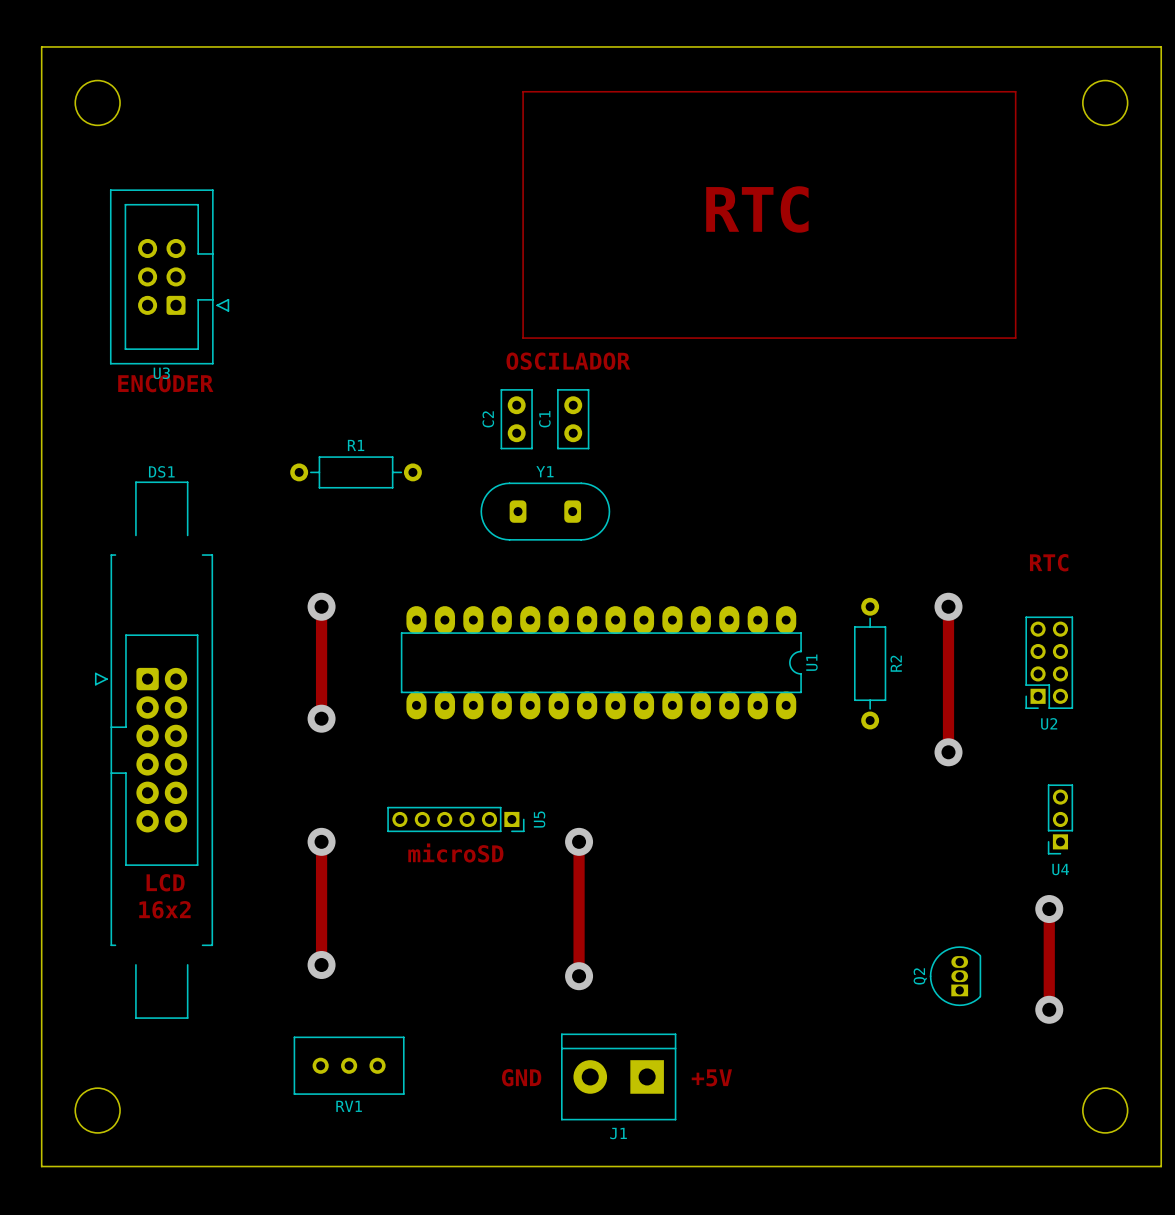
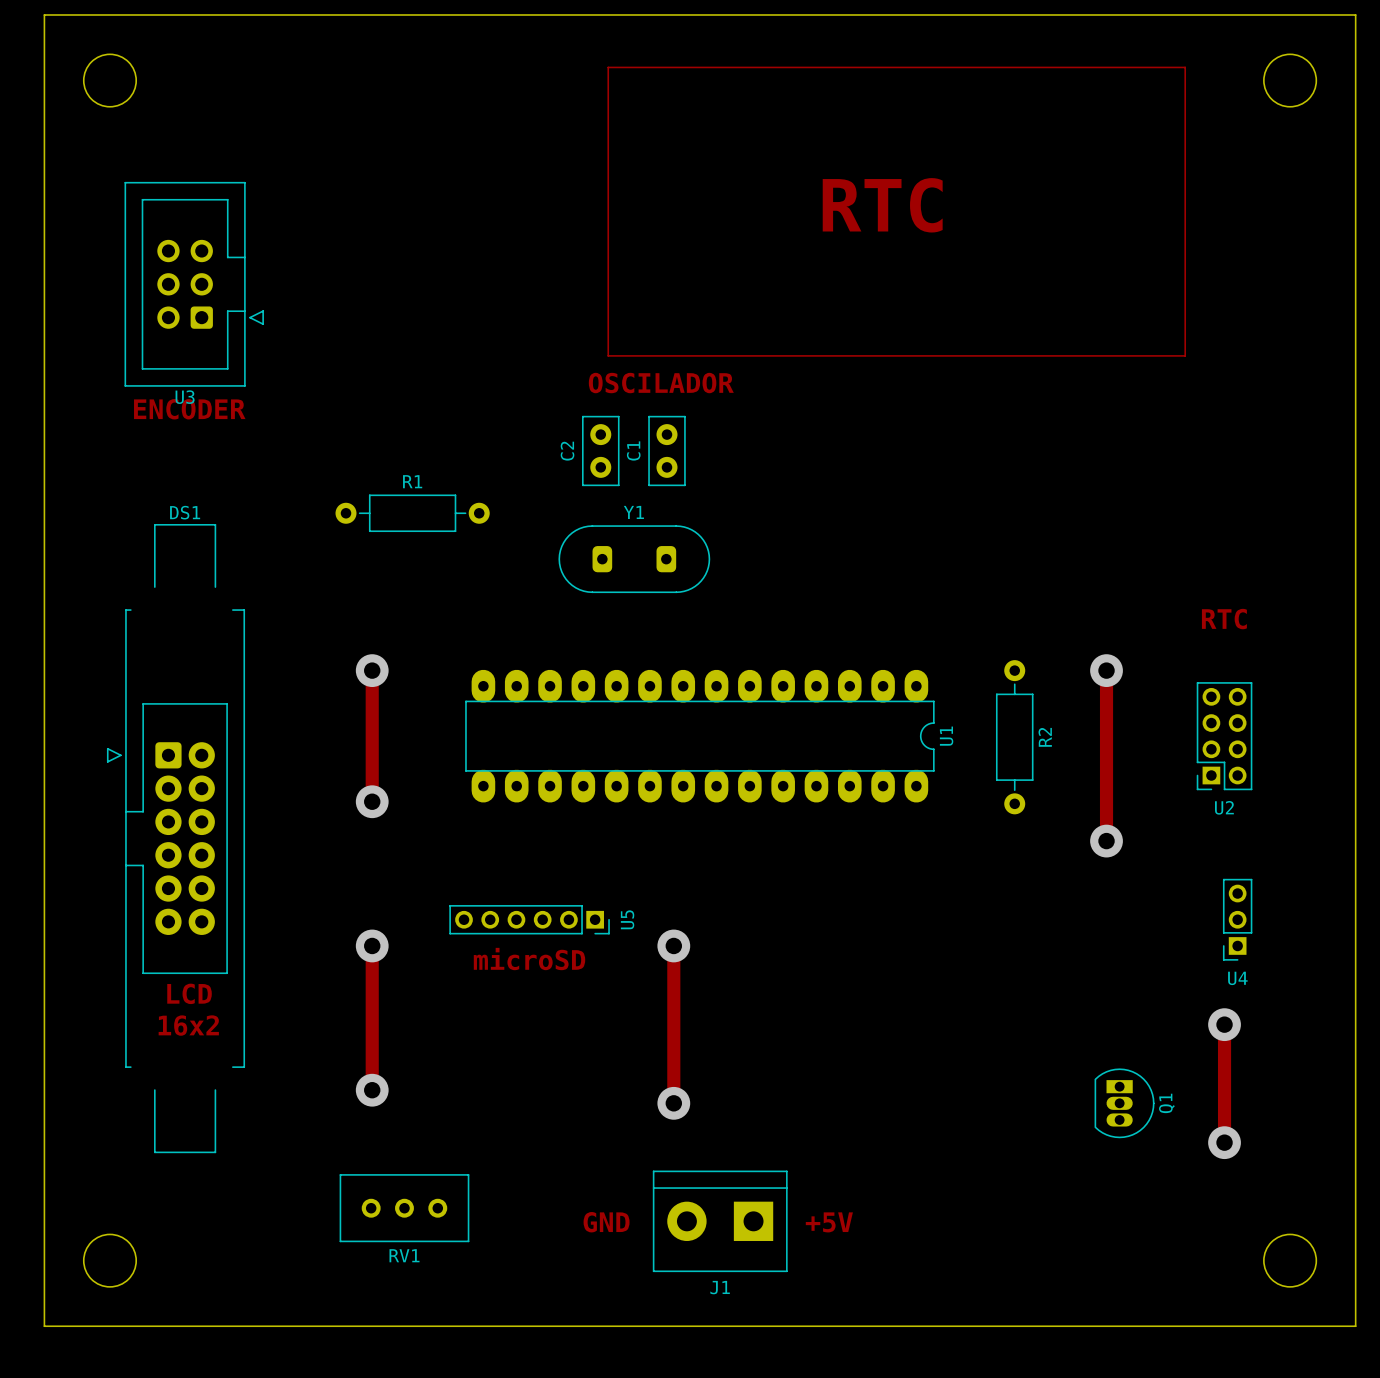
Q2: (955, 976) -> none
Q1: none -> (1124, 1103)

